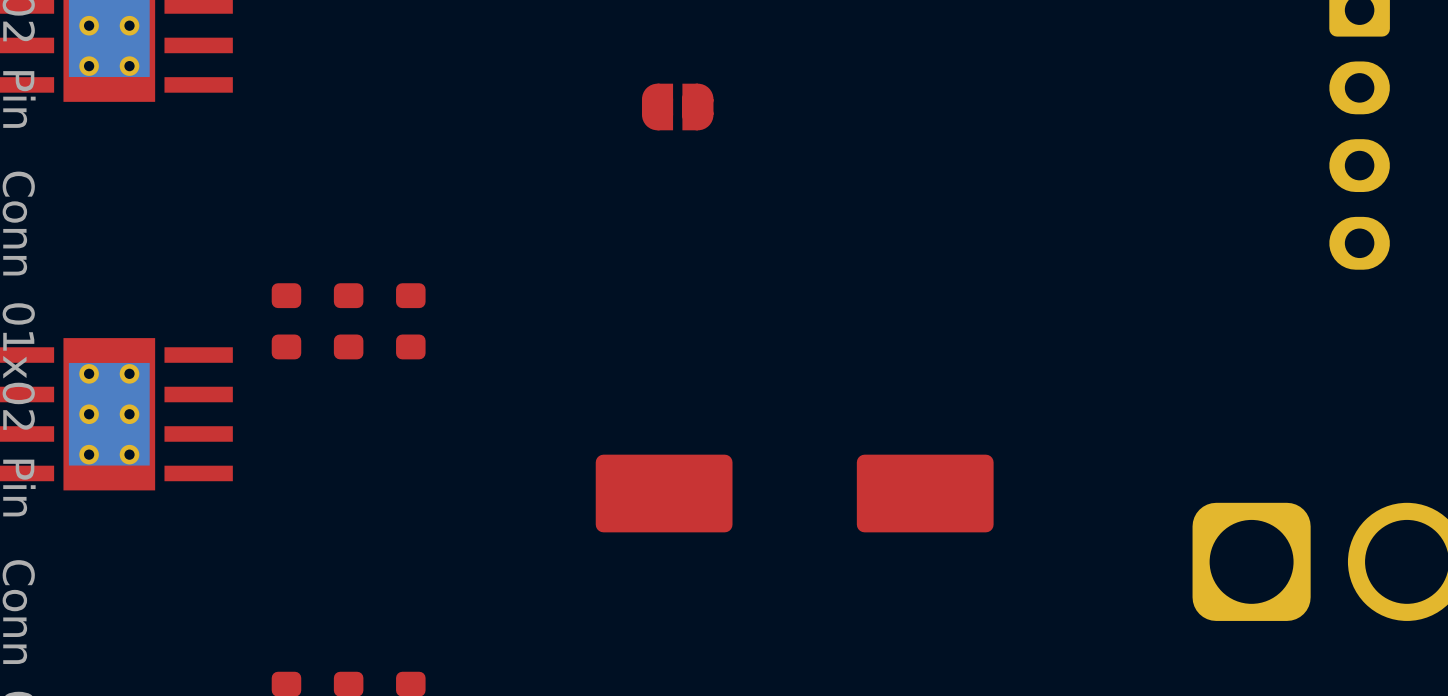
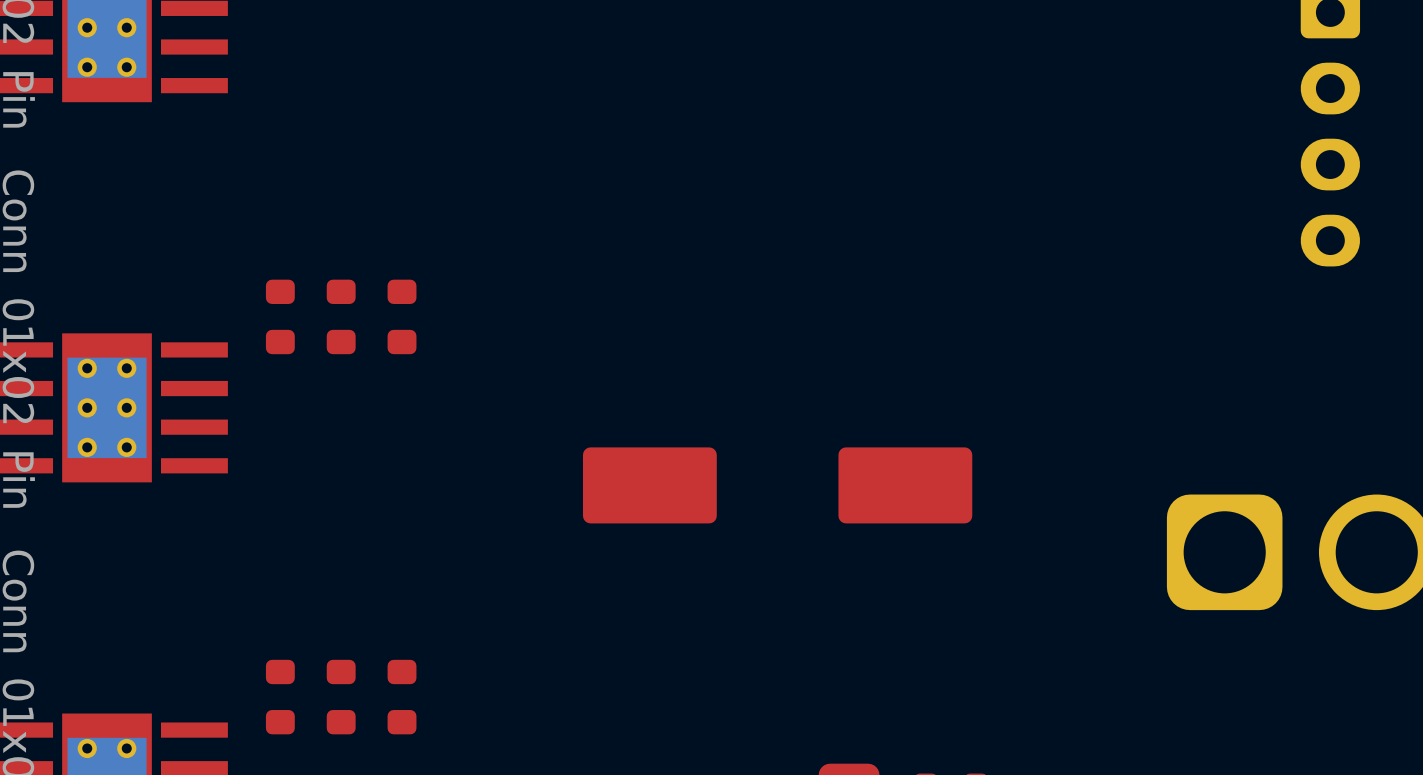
part: (677, 106) -> none

